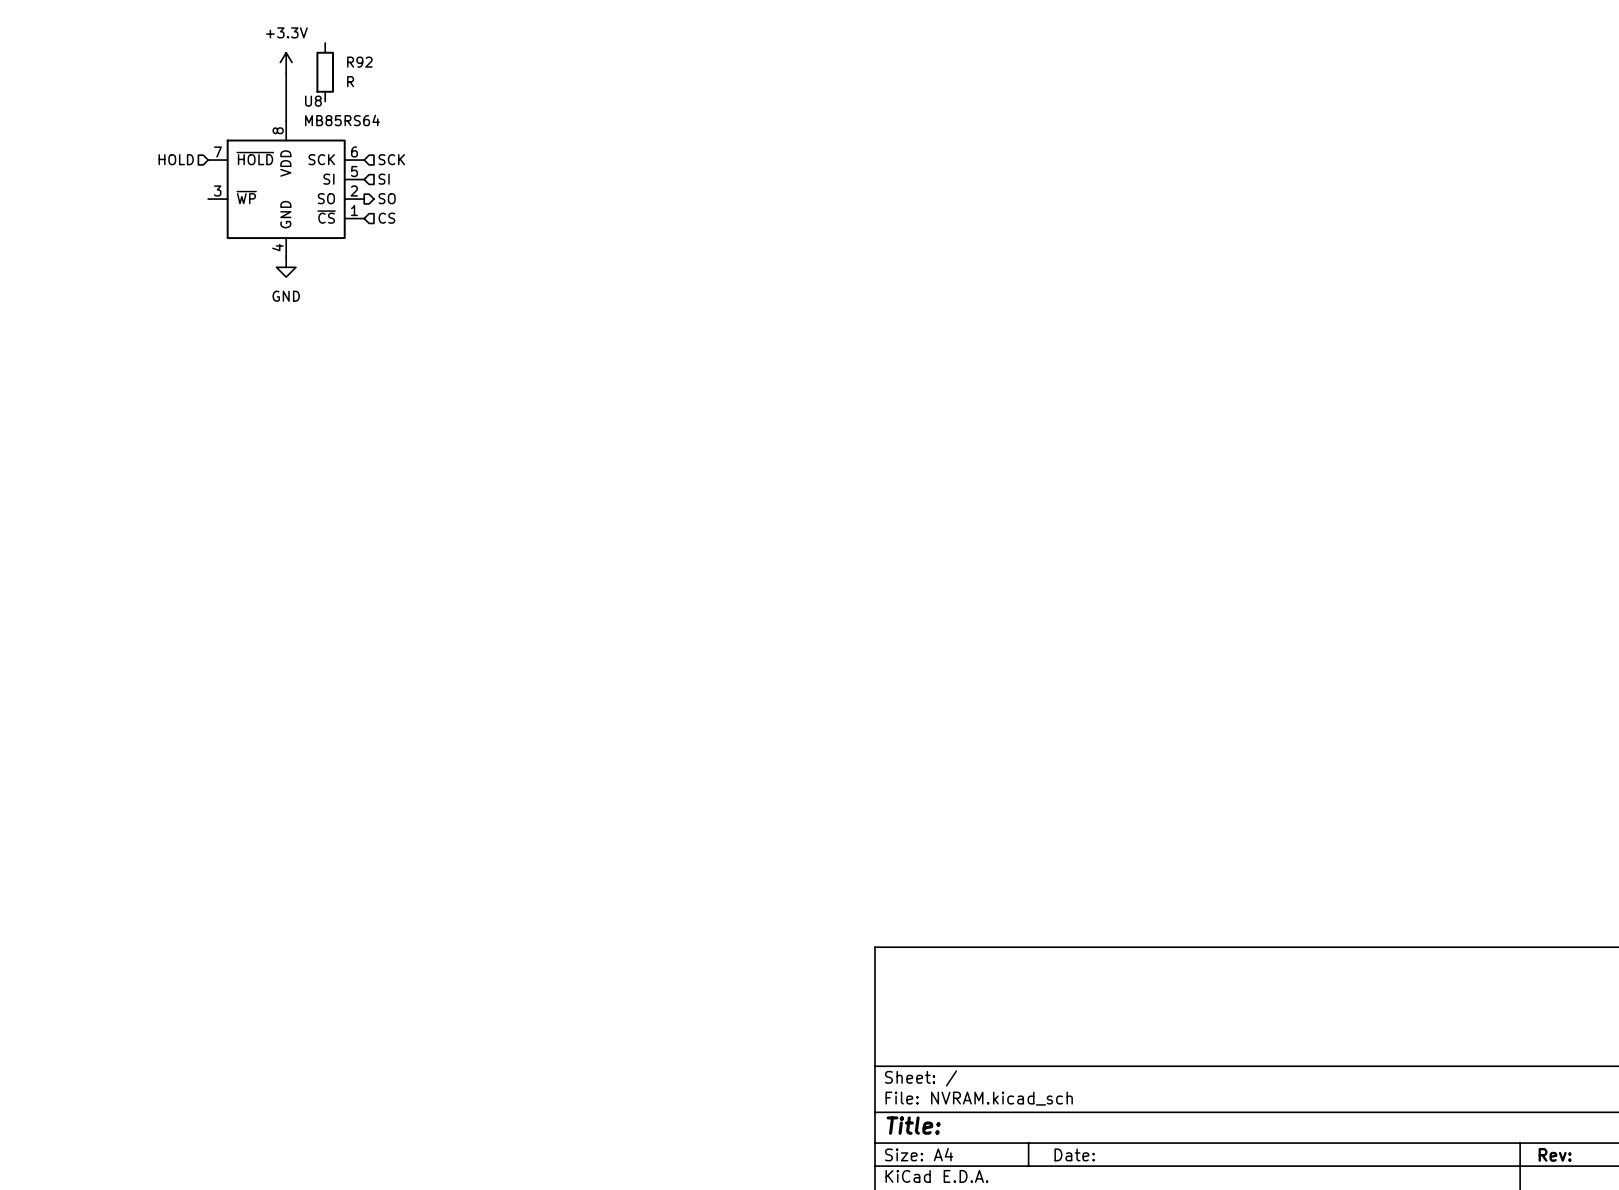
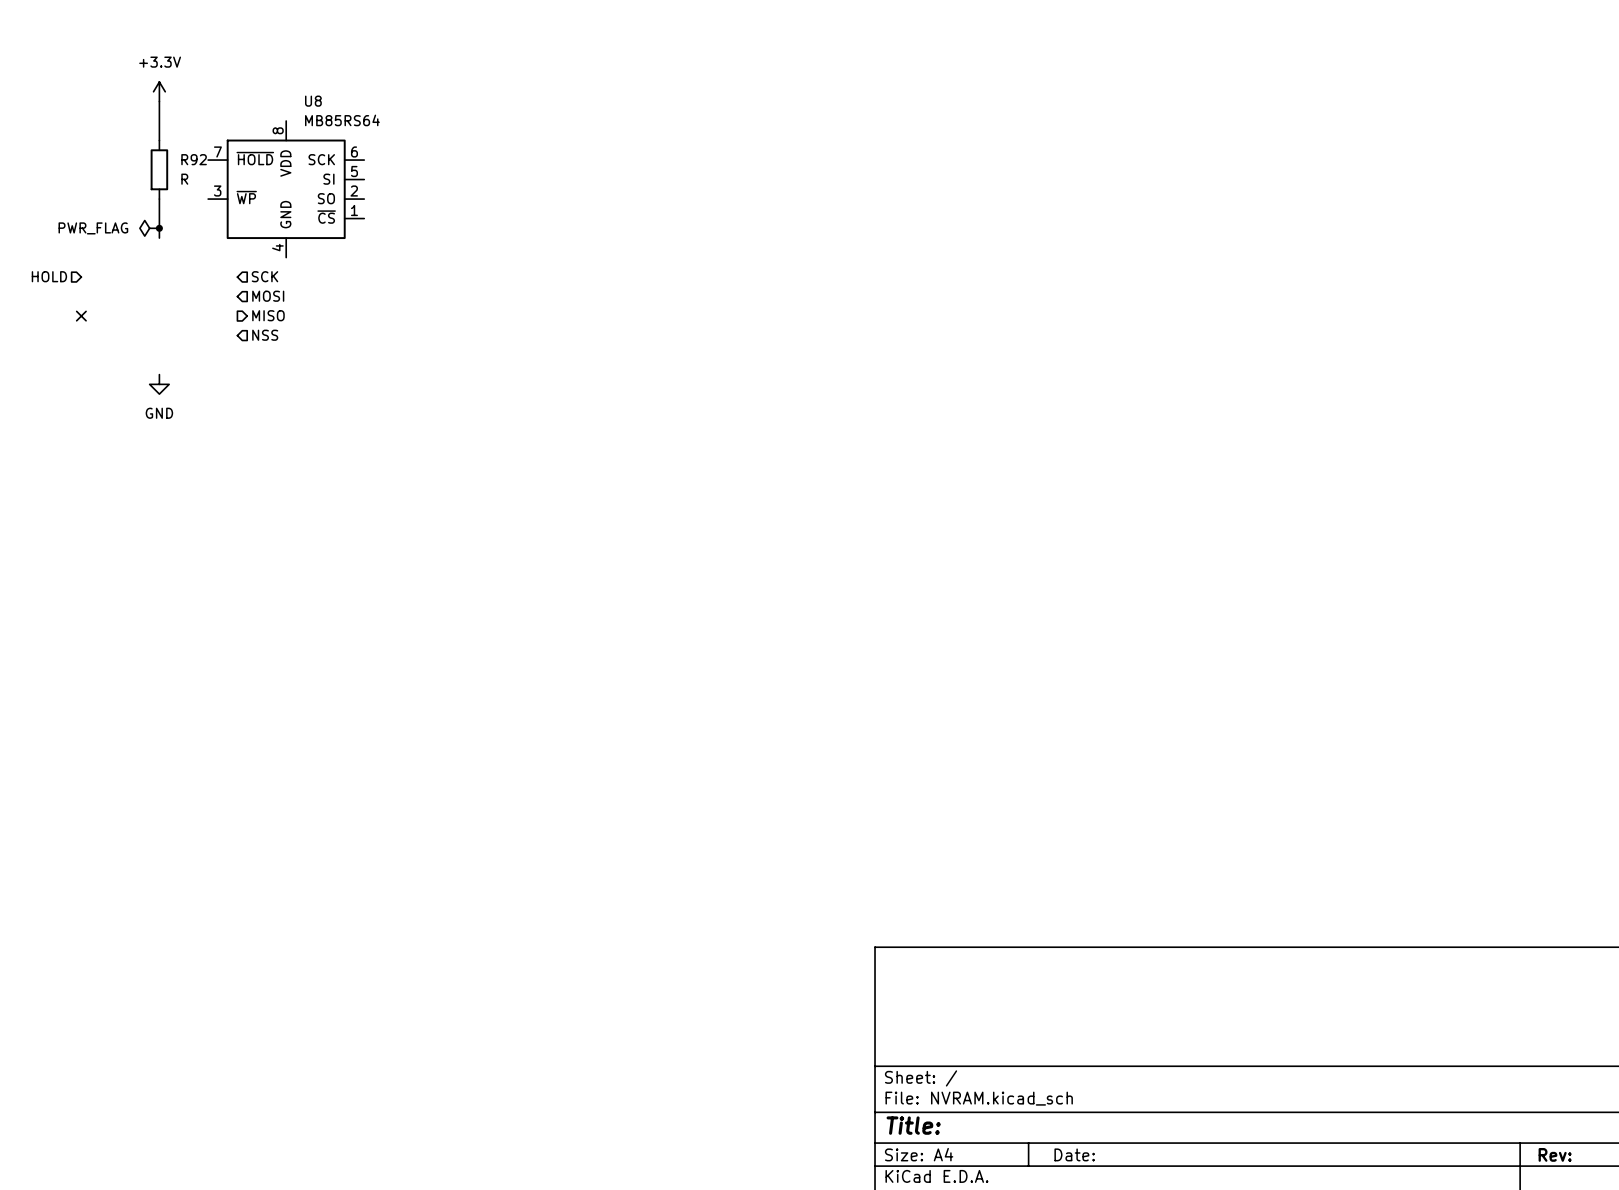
power symbol position: +3.3V (286, 62) -> +3.3V (159, 91)
wire: (286, 72) (286, 121) -> none
R92 position: (325, 72) -> (159, 169)
wire: none -> (159, 101) (159, 140)
hierarchical label position: HOLD (176, 159) -> HOLD (49, 276)
hierarchical label position: SCK (391, 159) -> SCK (264, 276)
hierarchical label: SI (384, 179) -> none
hierarchical label: SO (387, 198) -> none
wire: none -> (159, 199) (159, 238)
hierarchical label: CS (386, 218) -> none
power symbol: none -> PWR_FLAG (149, 228)
junction: none -> (159, 228)
power symbol position: GND (286, 267) -> GND (159, 384)
hierarchical label: none -> MOSI (268, 296)
hierarchical label: none -> MISO (268, 315)
no-connect mark: none -> (81, 316)
hierarchical label: none -> NSS (265, 335)

